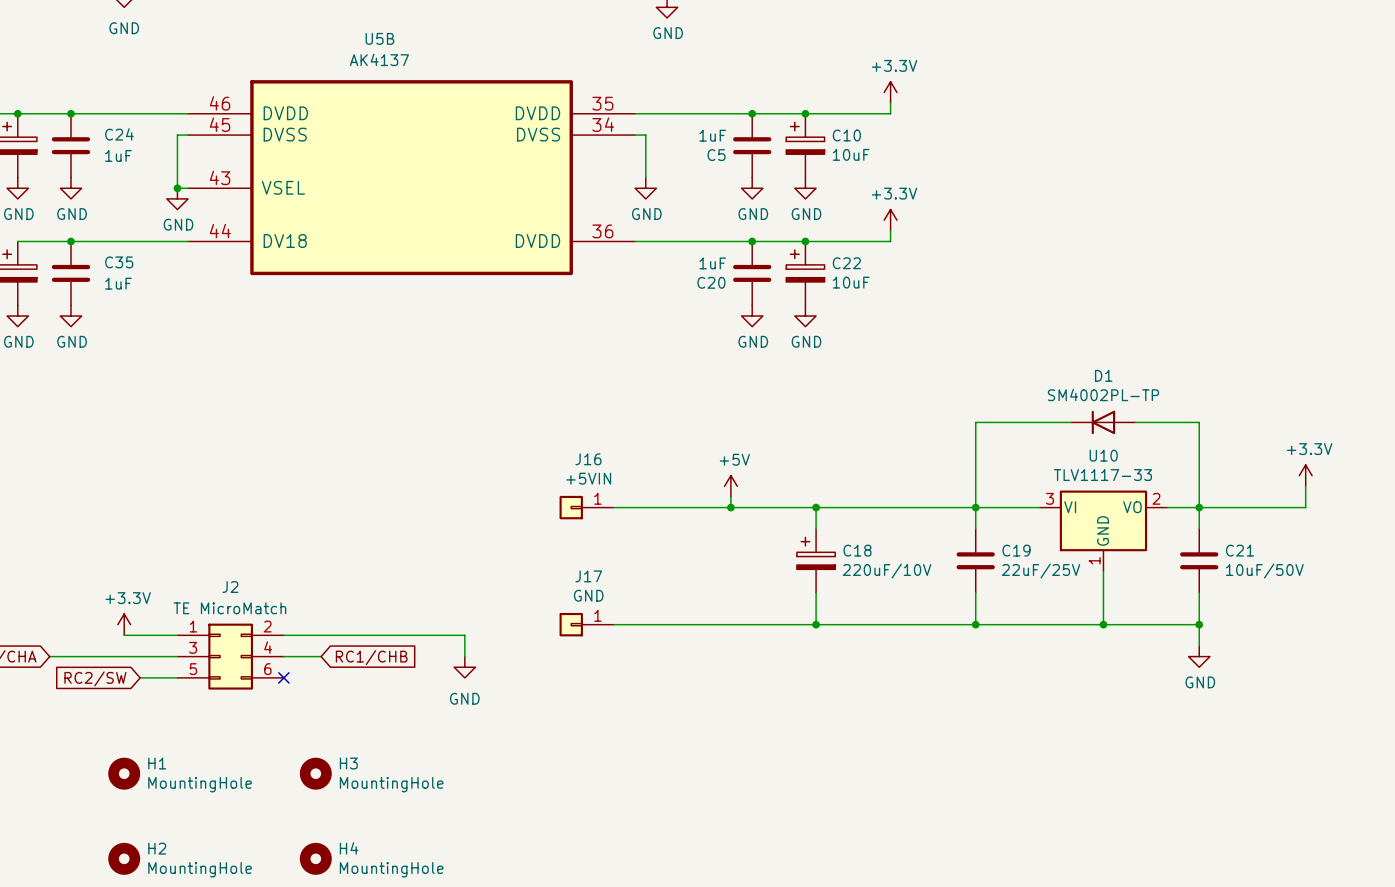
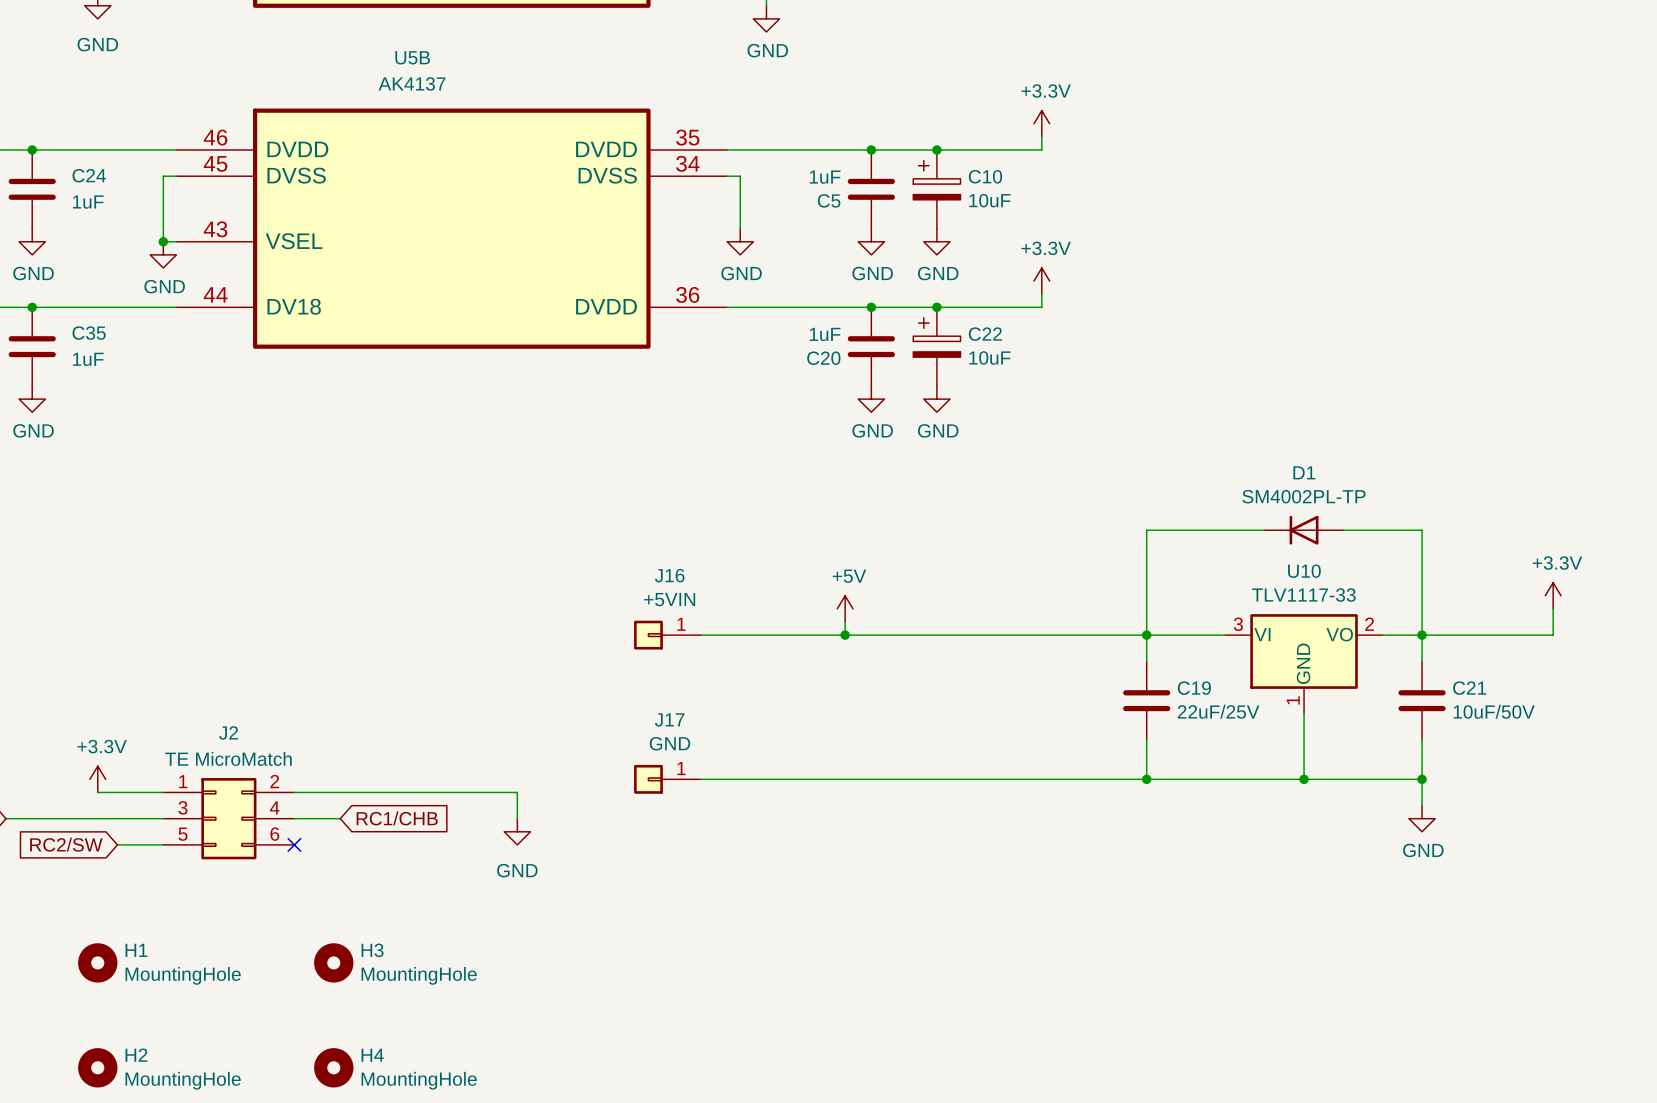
wire: (816, 507) (816, 528) -> none
junction: (816, 507) -> none
C18: 220uF/10V (816, 560) -> none
wire: (816, 592) (816, 624) -> none
junction: (816, 624) -> none

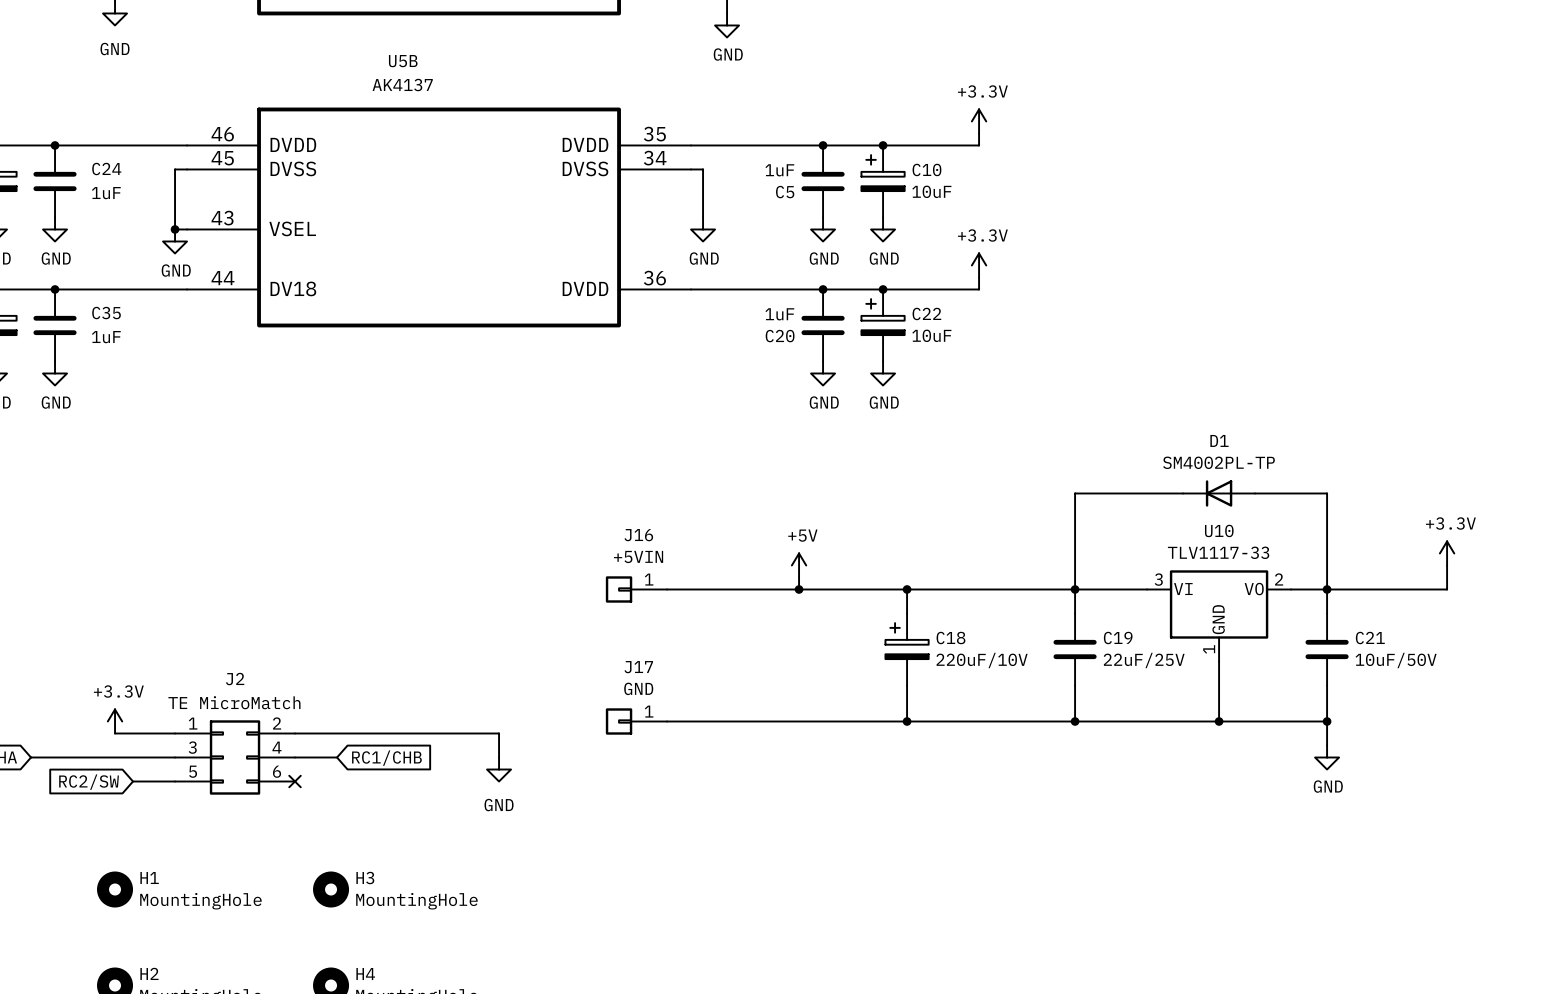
wire: none -> (907, 589) (907, 613)
junction: none -> (907, 589)
C18: none -> 220uF/10V (907, 649)
wire: none -> (907, 685) (907, 721)
junction: none -> (907, 721)

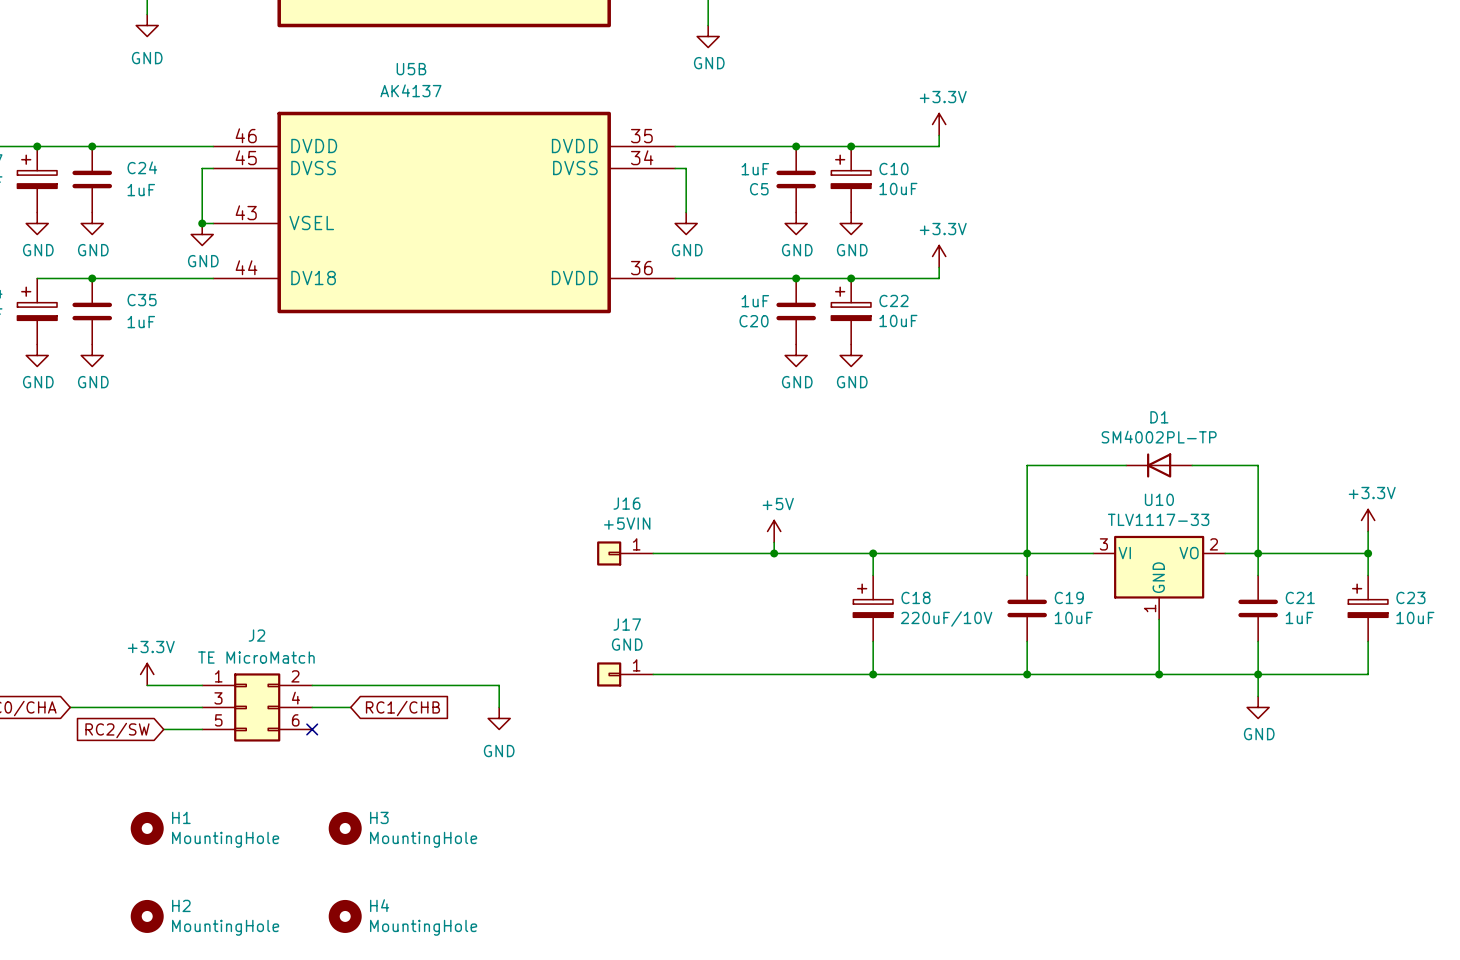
wire: none -> (1368, 553) (1368, 575)
junction: none -> (1368, 553)
C23: none -> 10uF (1368, 608)
C19 value: 22uF/25V (1144, 660) -> 10uF (1073, 617)
C21 value: 10uF/50V (1396, 660) -> 1uF (1299, 617)
wire: none -> (1368, 641) (1368, 674) (1258, 674)

